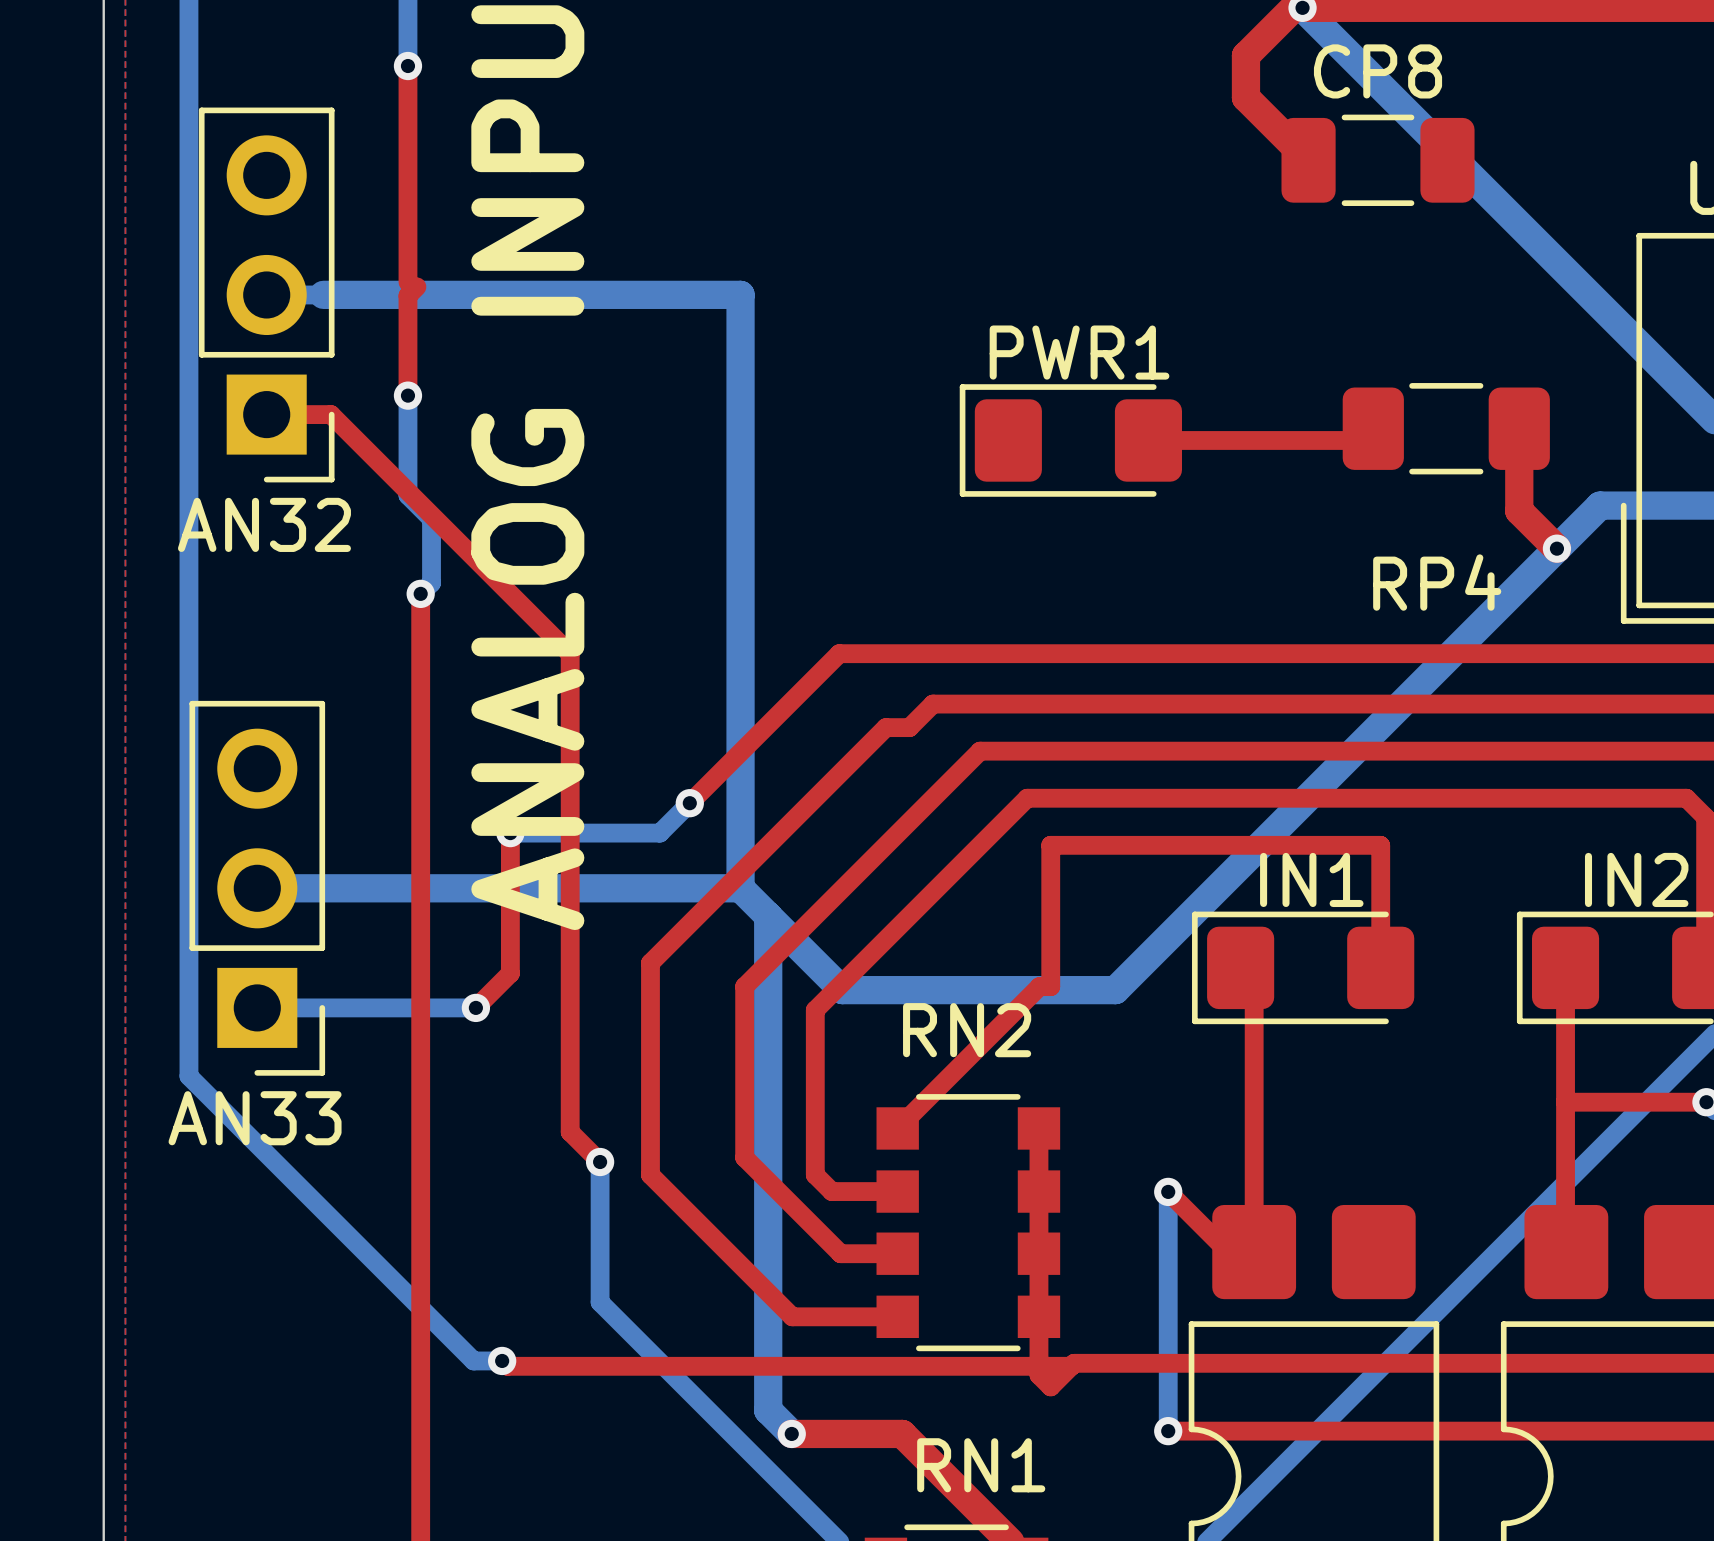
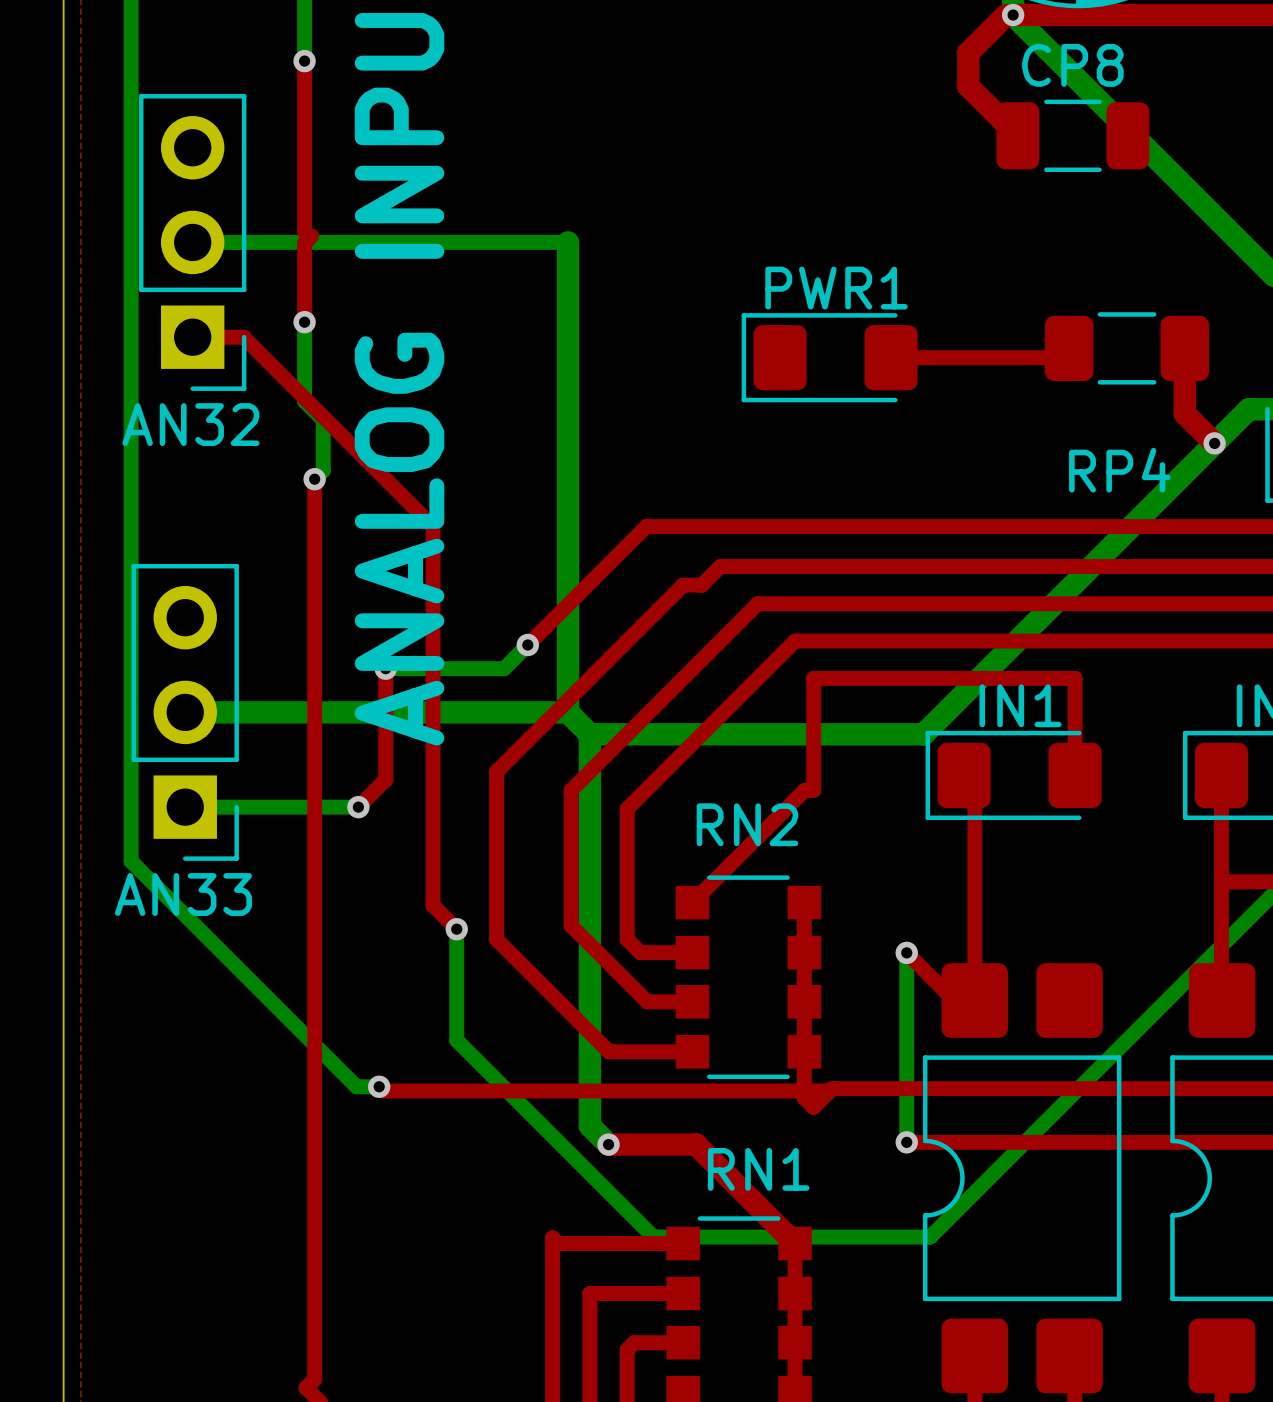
bottom track width: thick (323, 294) (740, 294) -> thin (237, 242) (568, 242)
bottom track: (768, 915) (842, 990) (1115, 990) (1189, 915) -> (589, 734) (923, 734)

